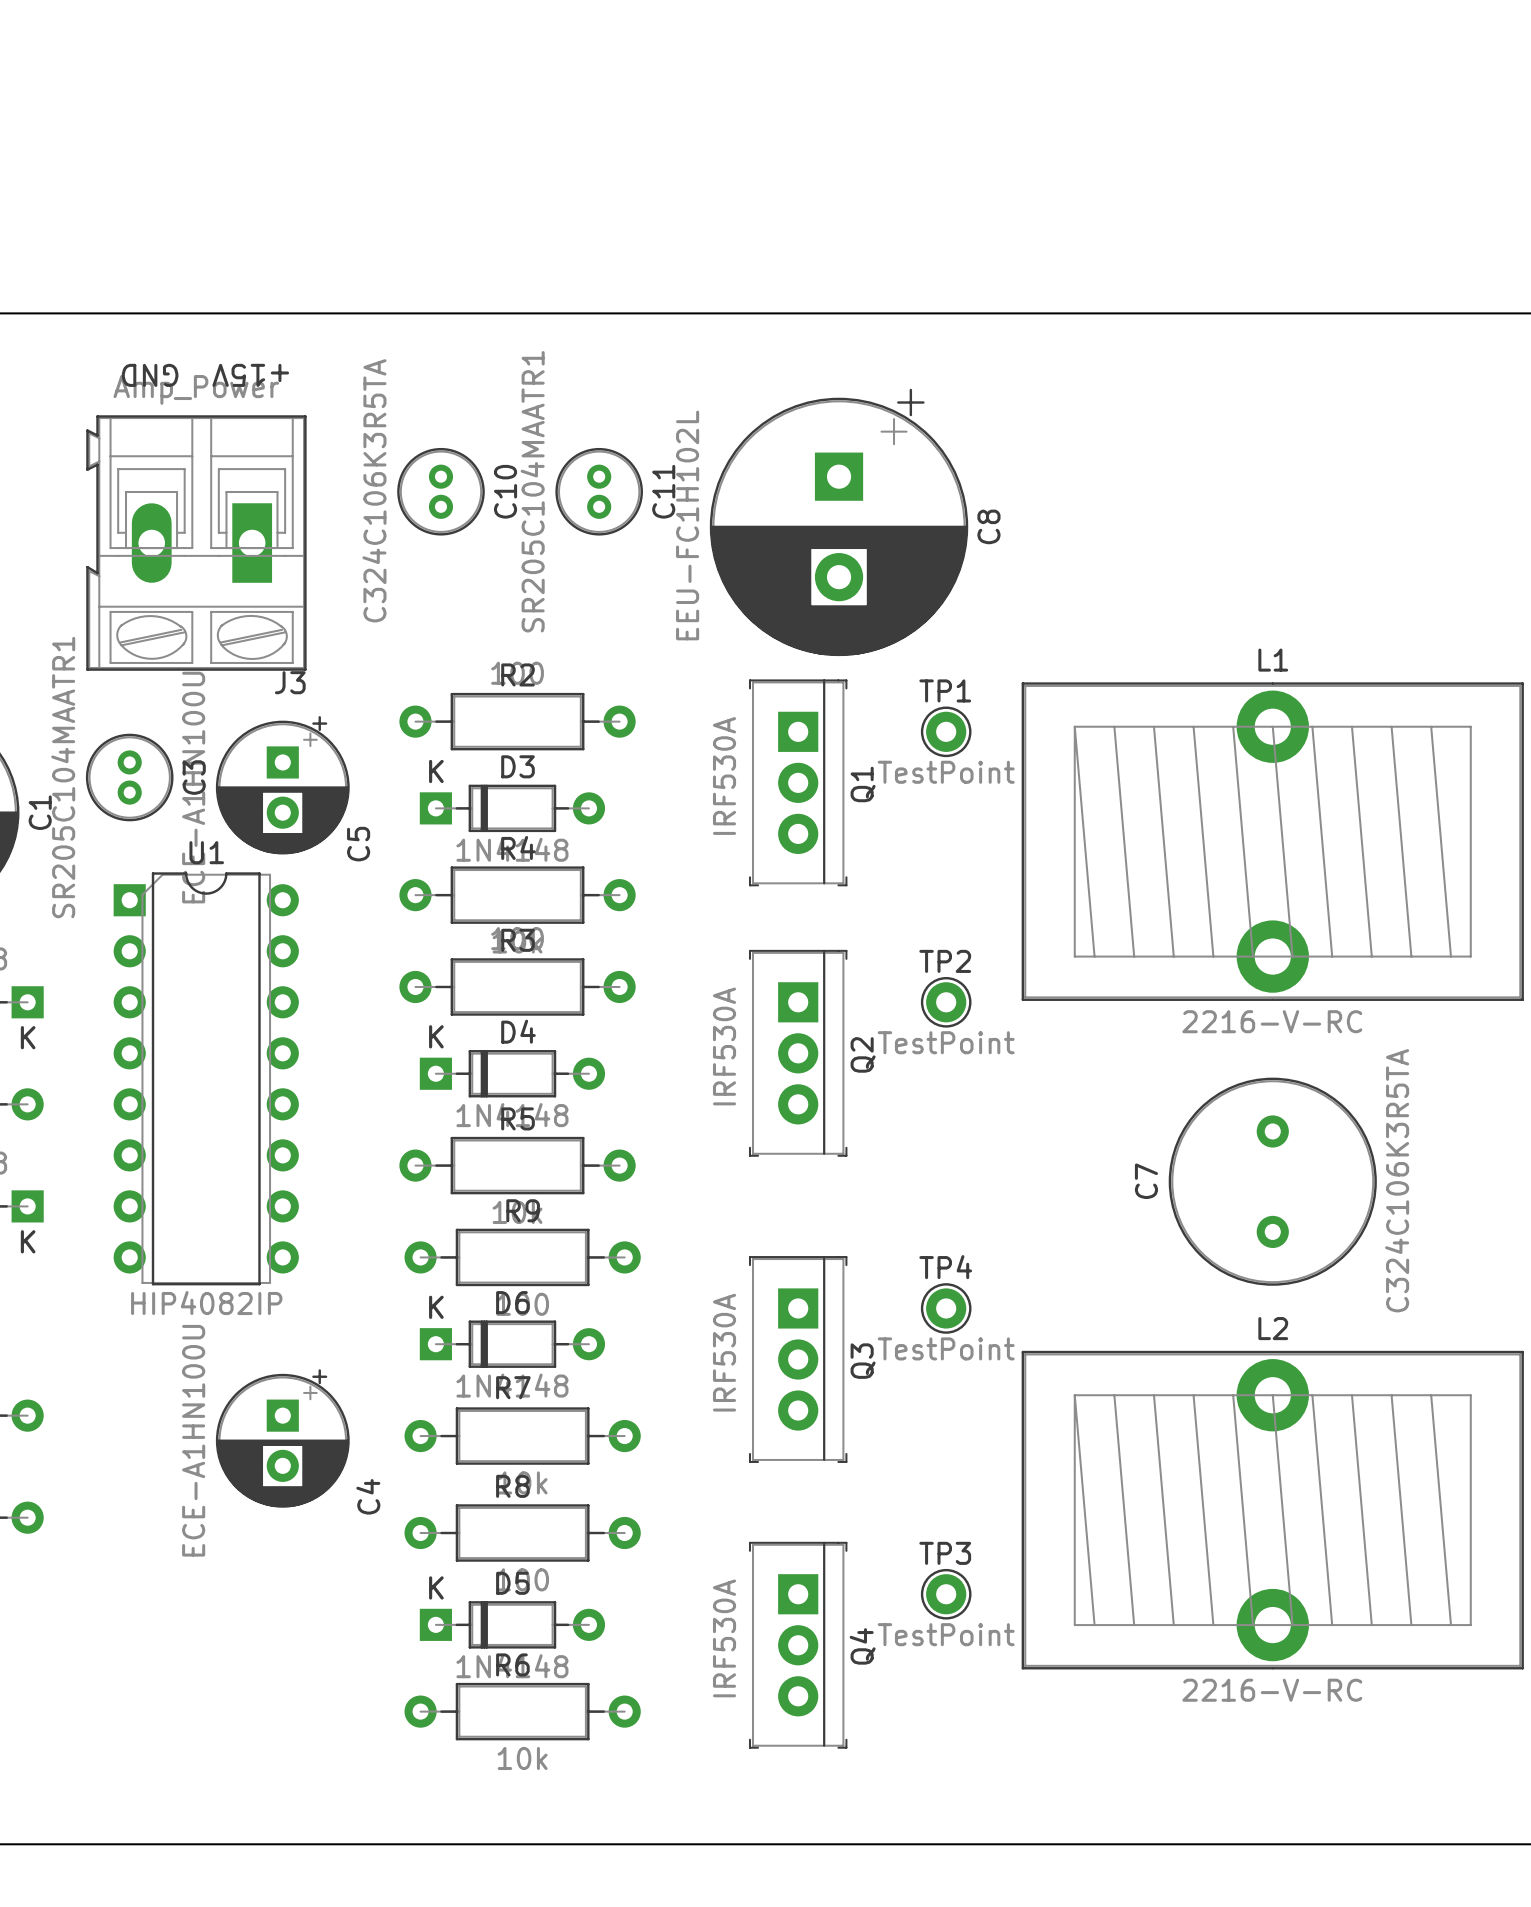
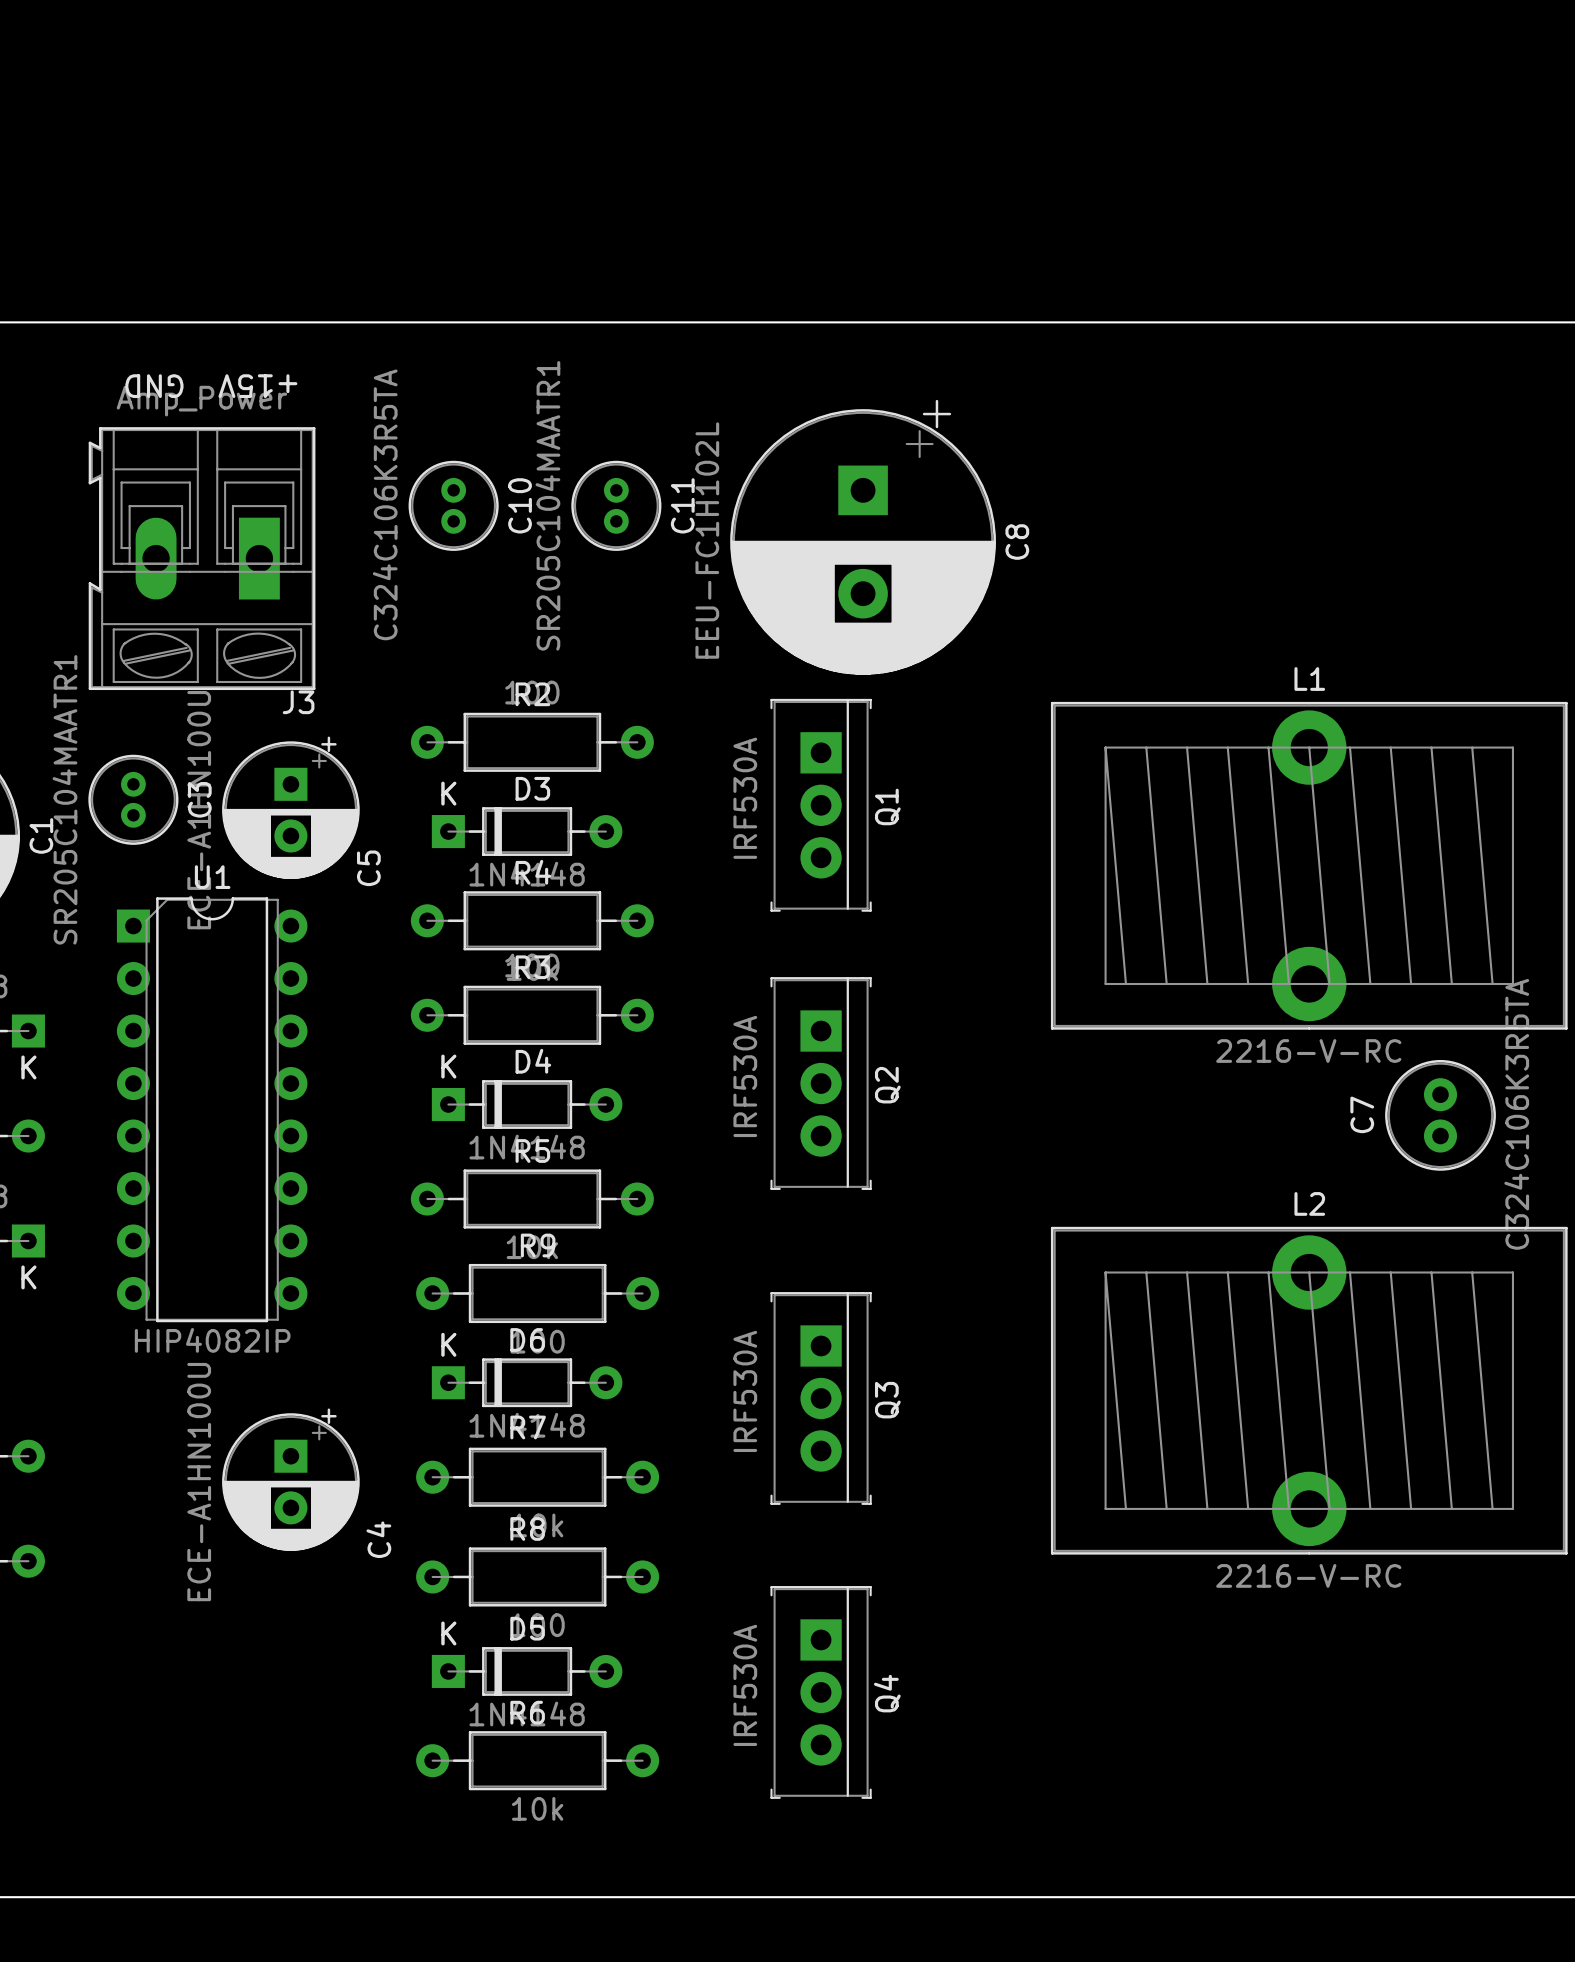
TP1: TestPoint (946, 731) -> none
TP2: TestPoint (946, 1002) -> none
C7 footprint: [1168, 1077, 1377, 1286] -> [1385, 1059, 1496, 1171]
C7 value position: C324C106K3R5TA (1397, 1180) -> C324C106K3R5TA (1516, 1114)
C7 name position: C7 (1146, 1181) -> C7 (1362, 1114)
TP4: TestPoint (946, 1308) -> none
L2 position: (1272, 1510) -> (1309, 1390)
TP3: TestPoint (946, 1594) -> none

